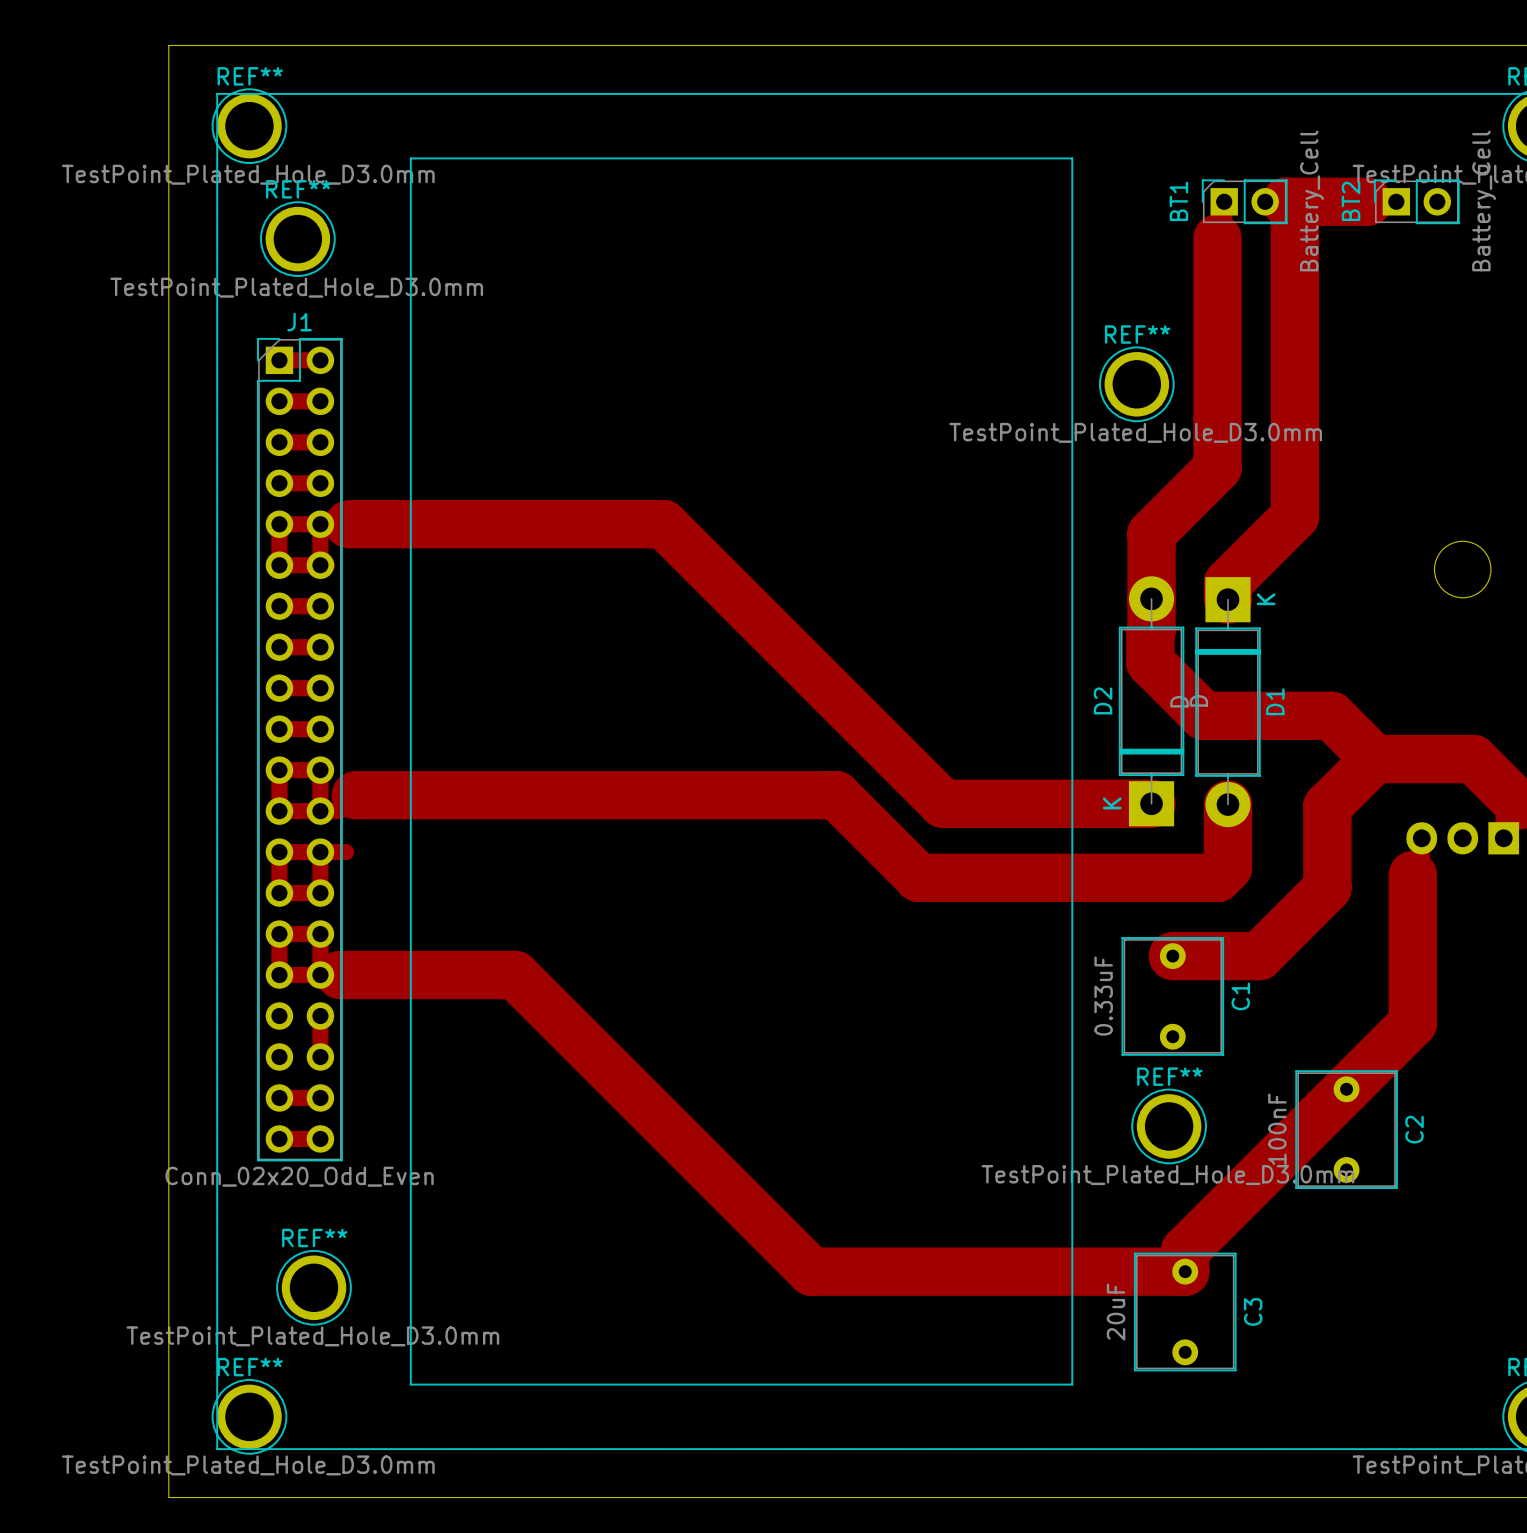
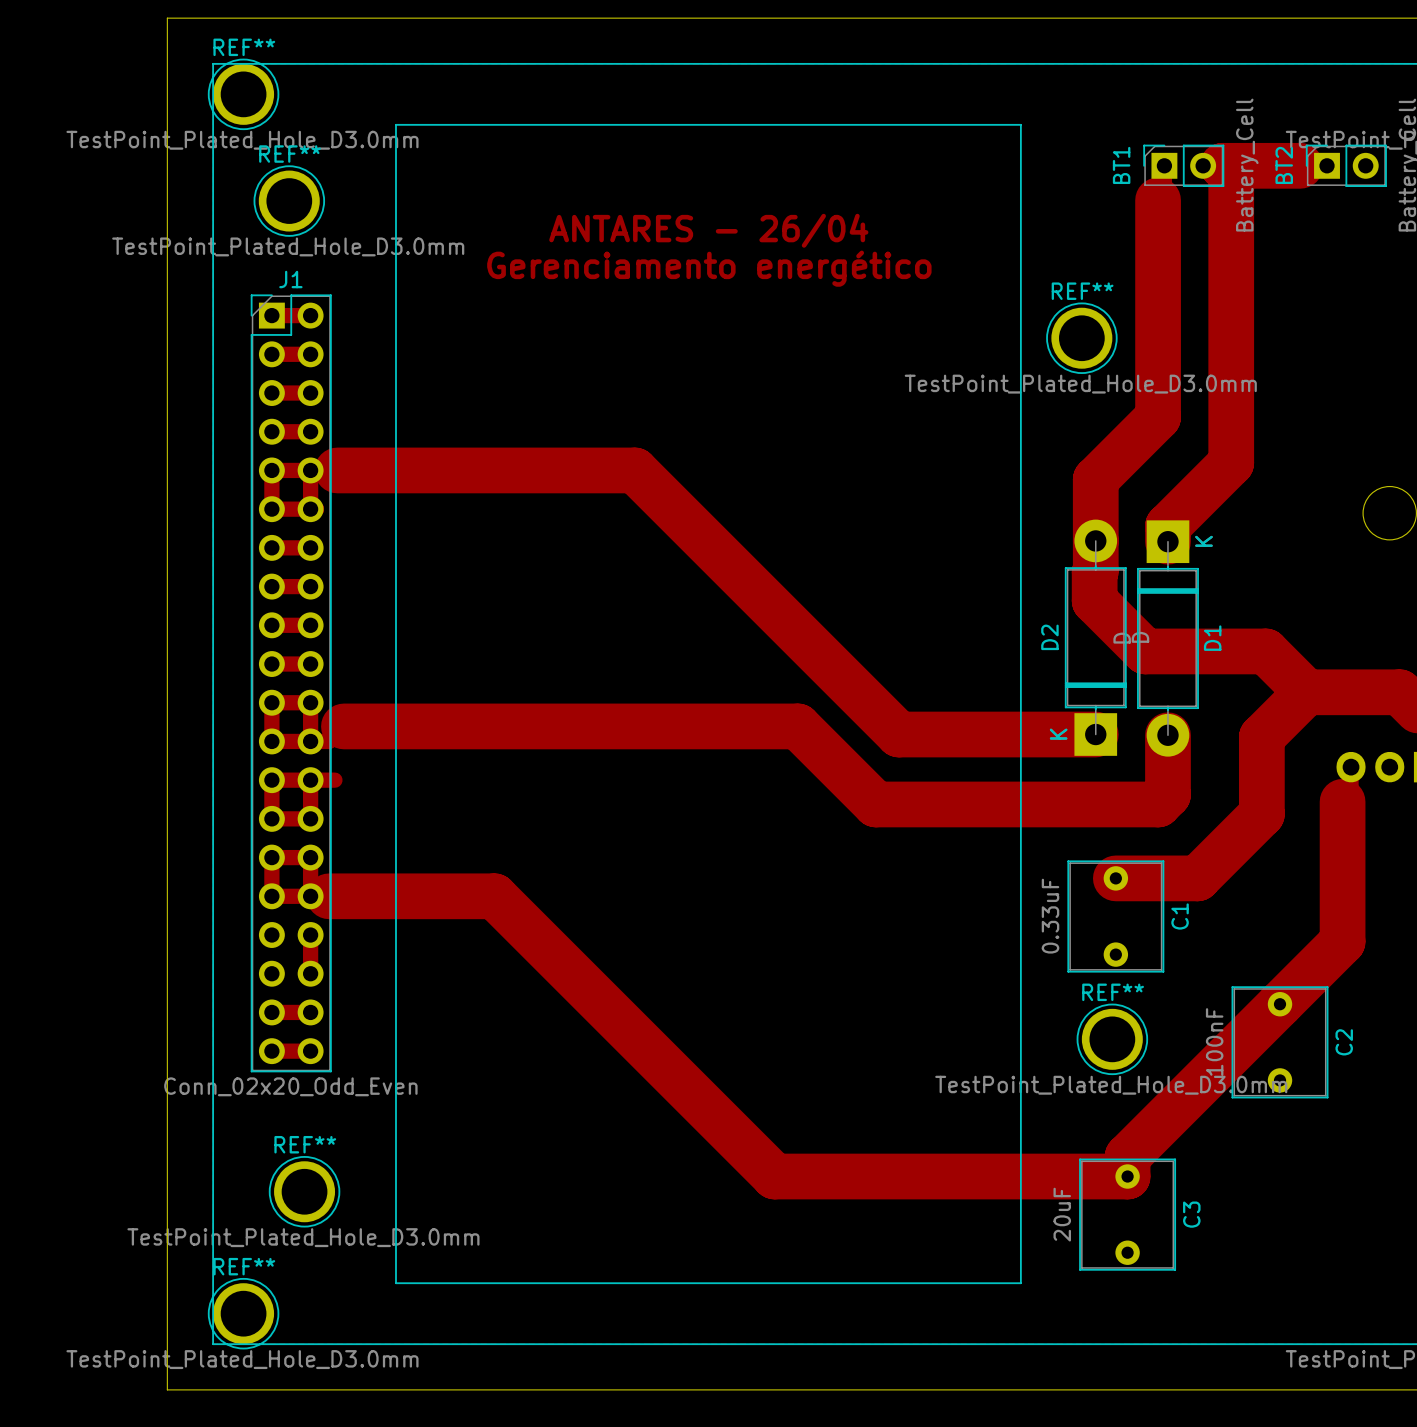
text: none -> ANTARES - 26/04 (708, 230)
text: none -> Gerenciamento energético (709, 268)

